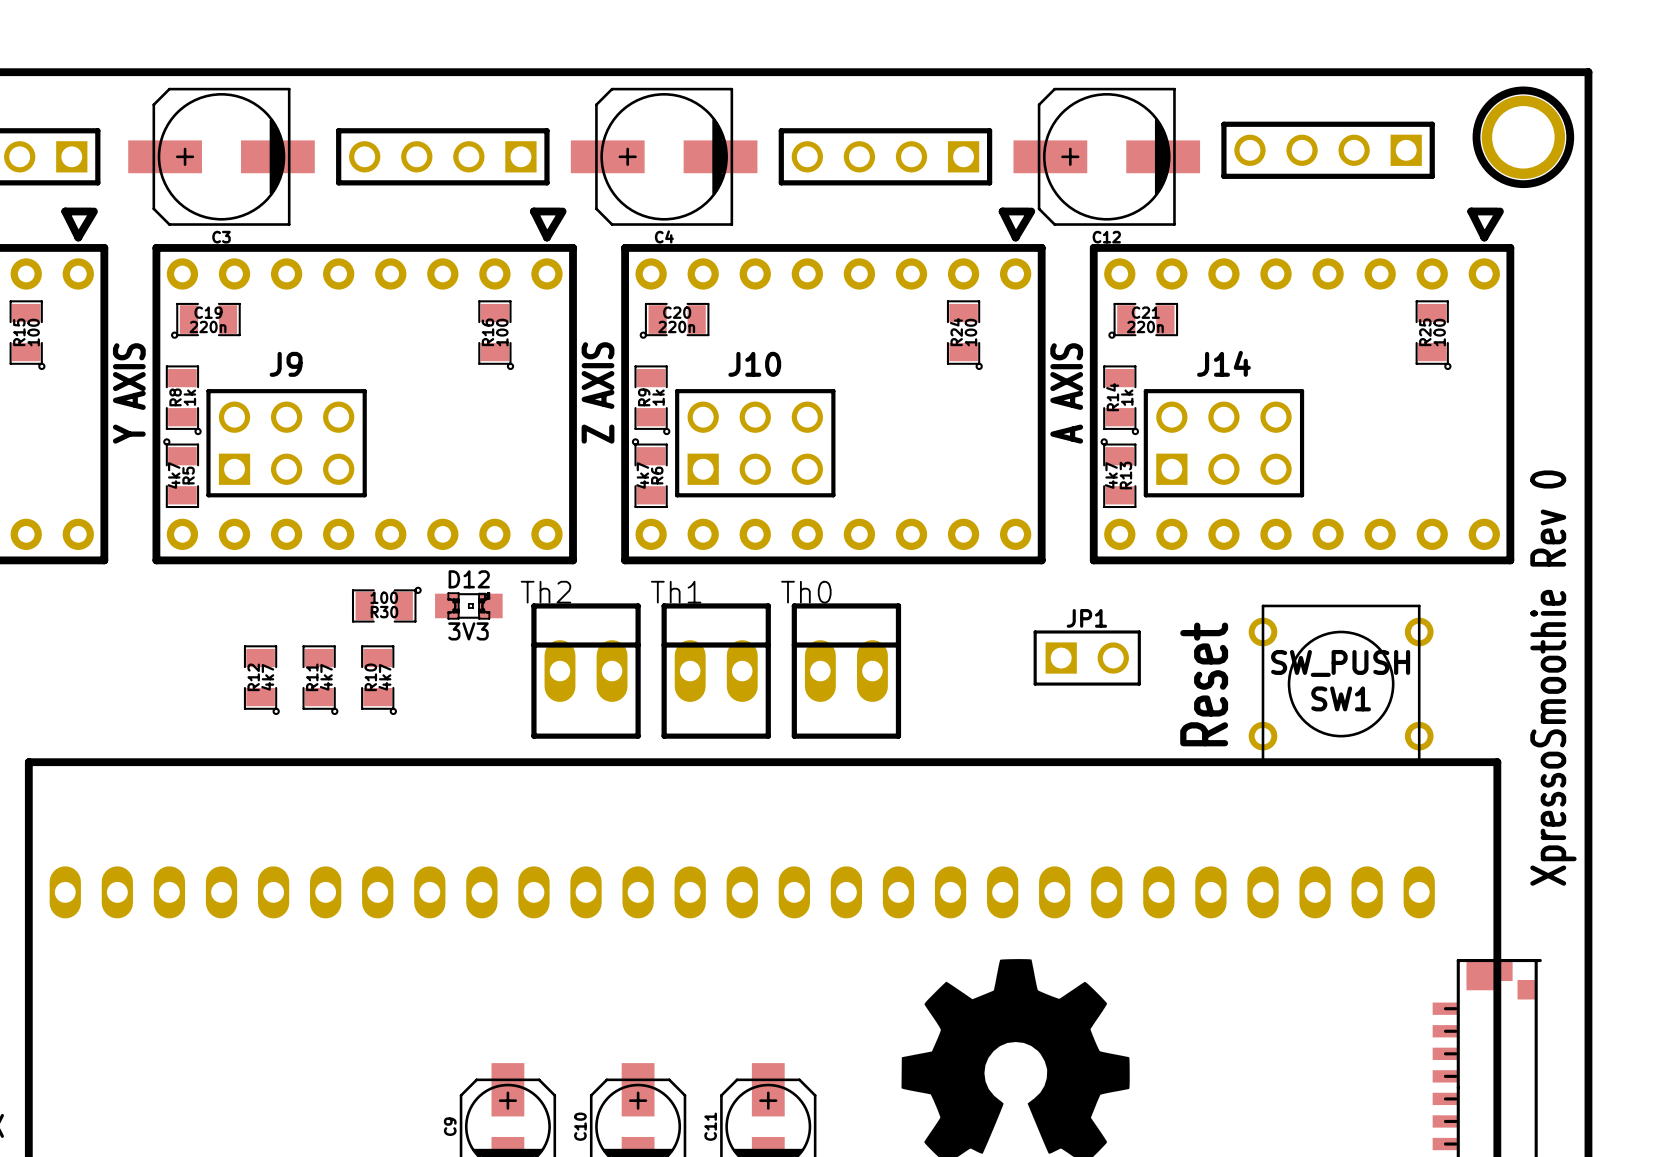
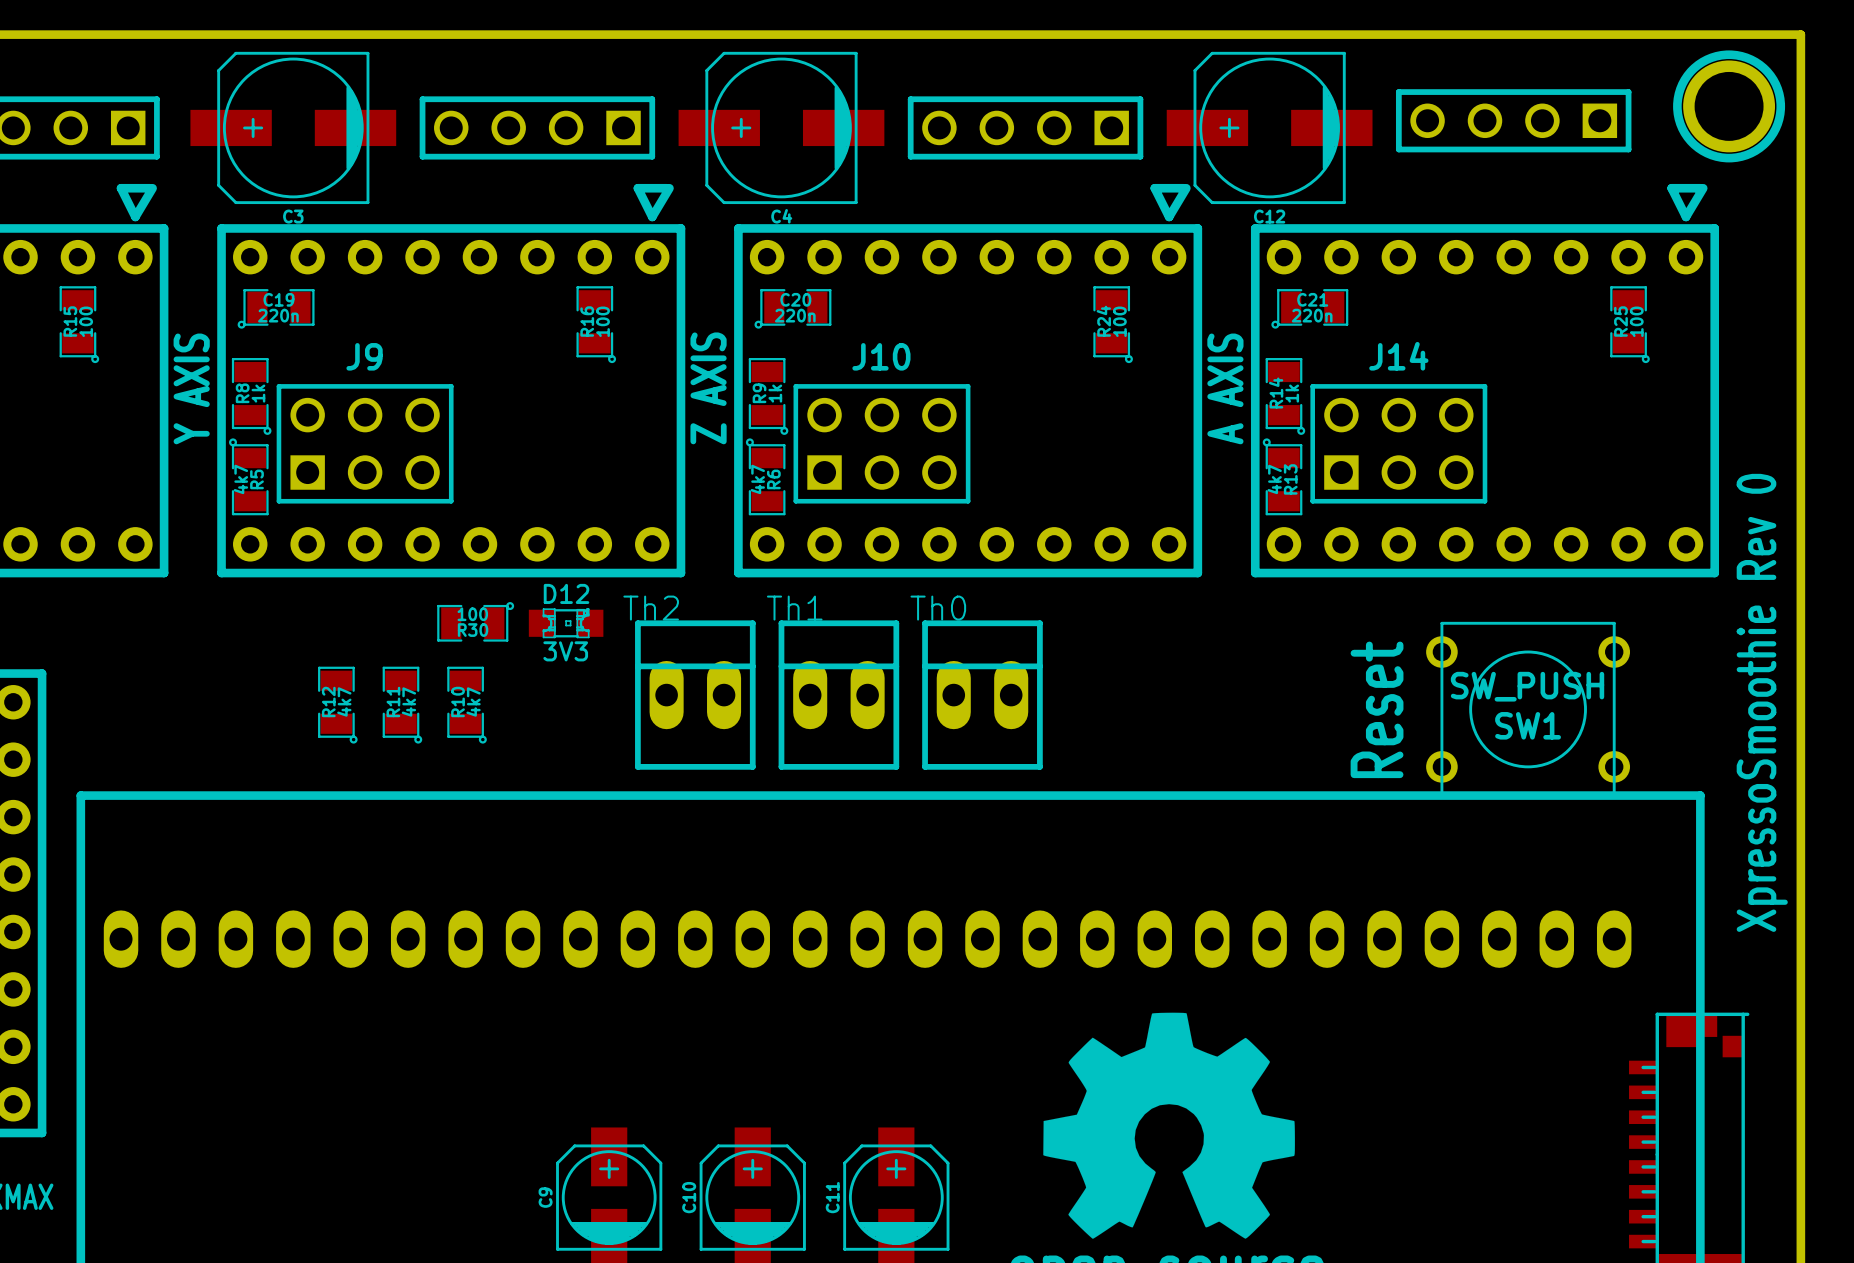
JP1: (1087, 658) -> none

